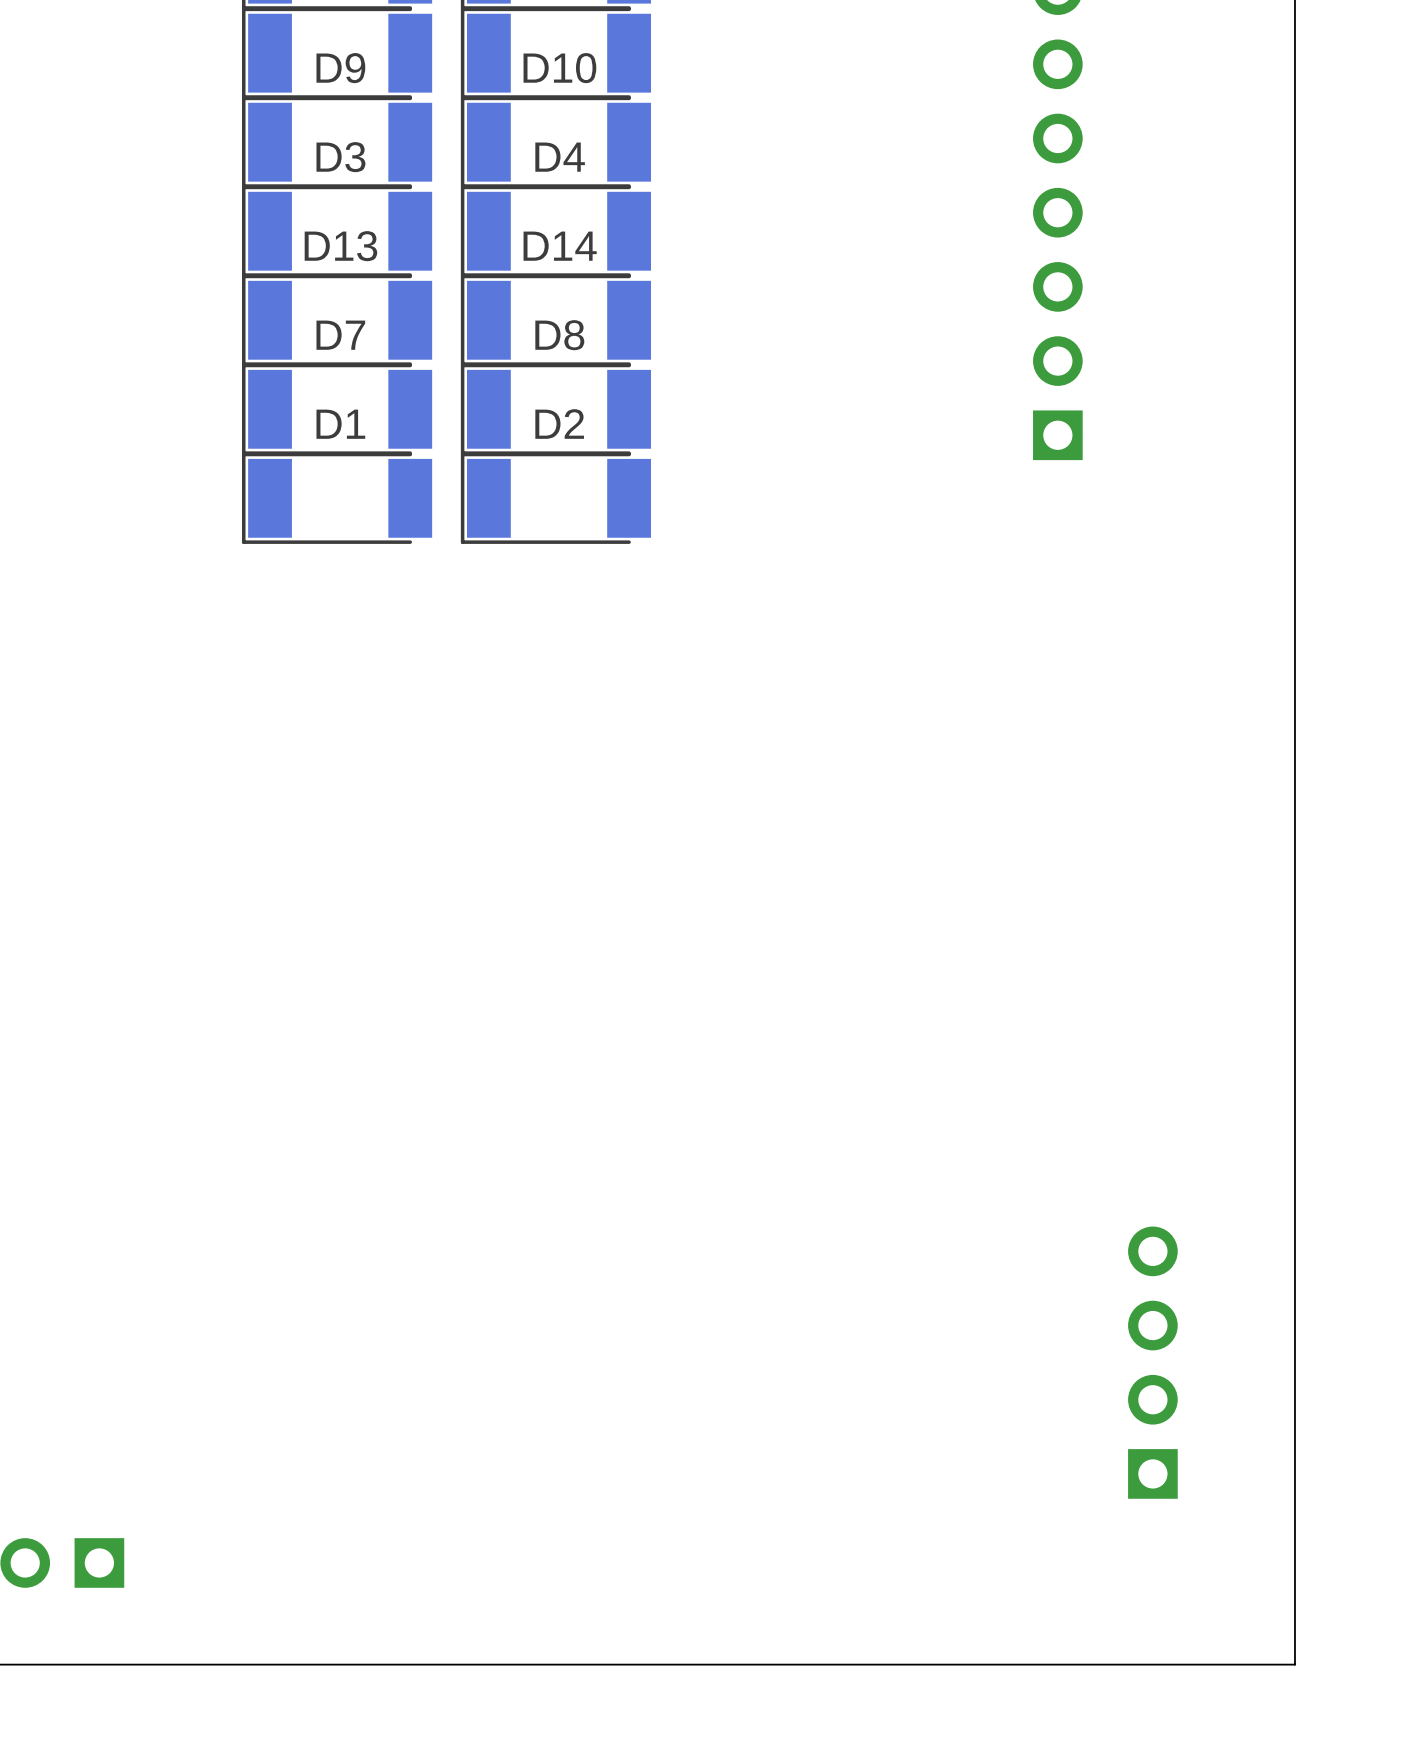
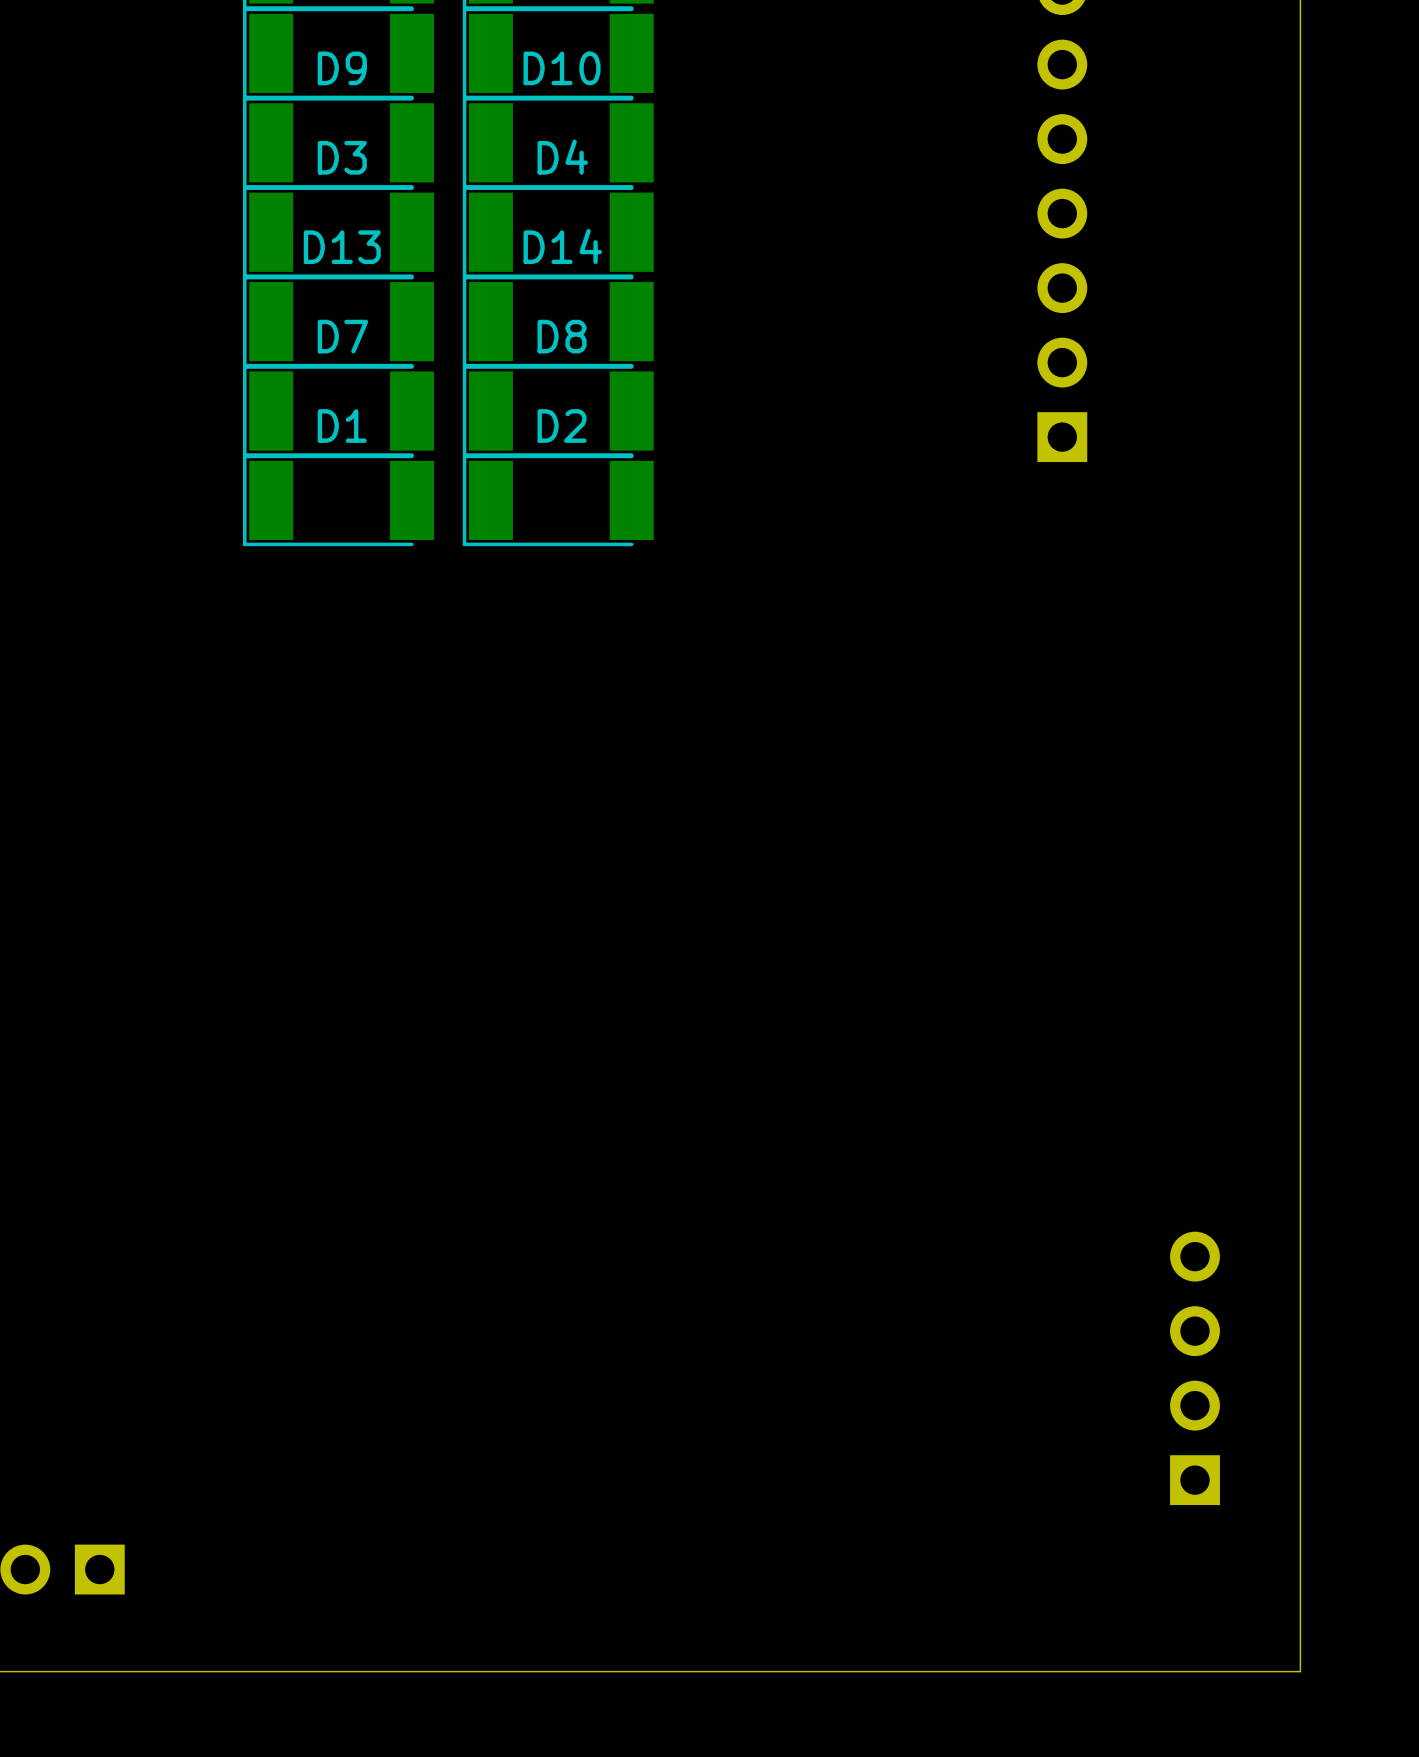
part position: (1152, 1362) -> (1195, 1368)

